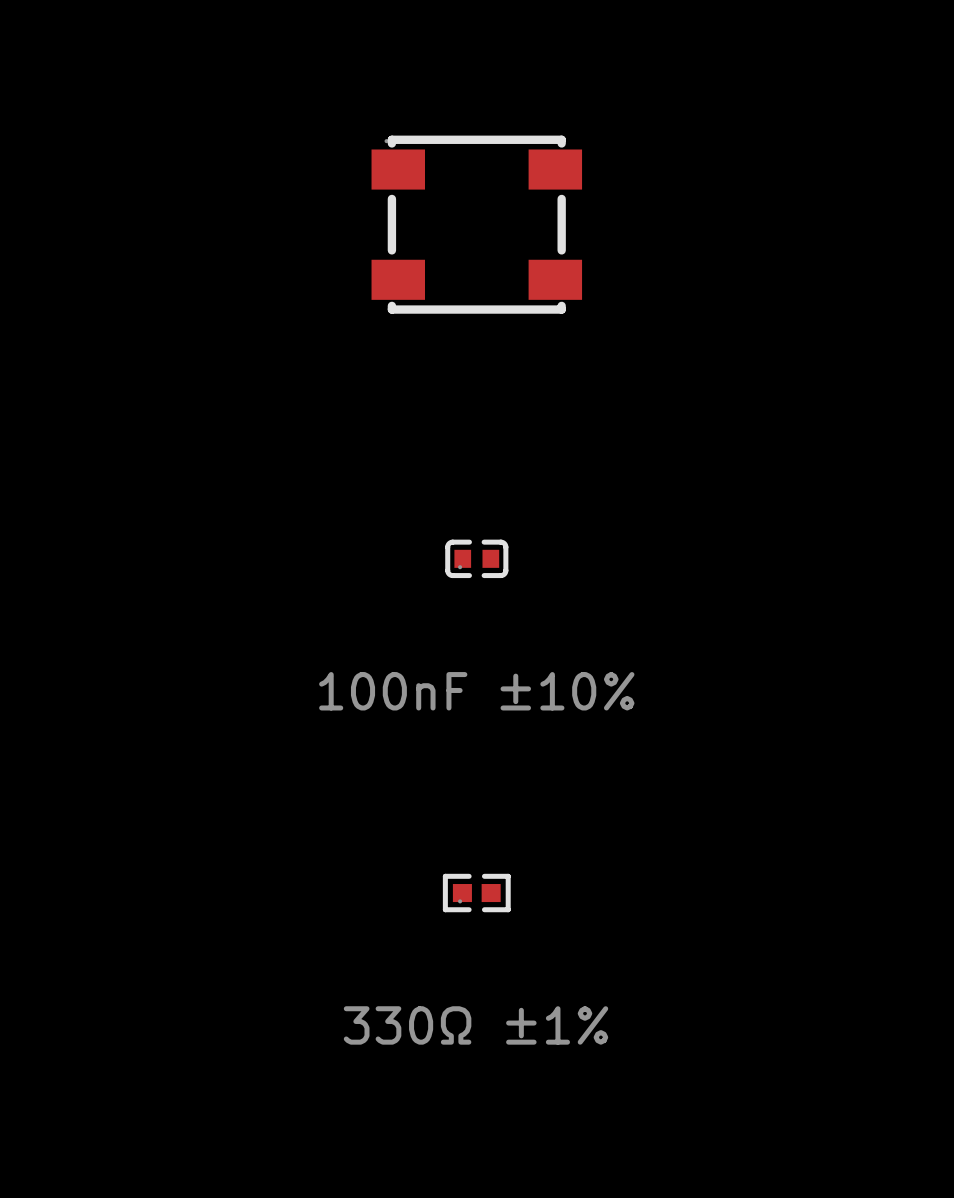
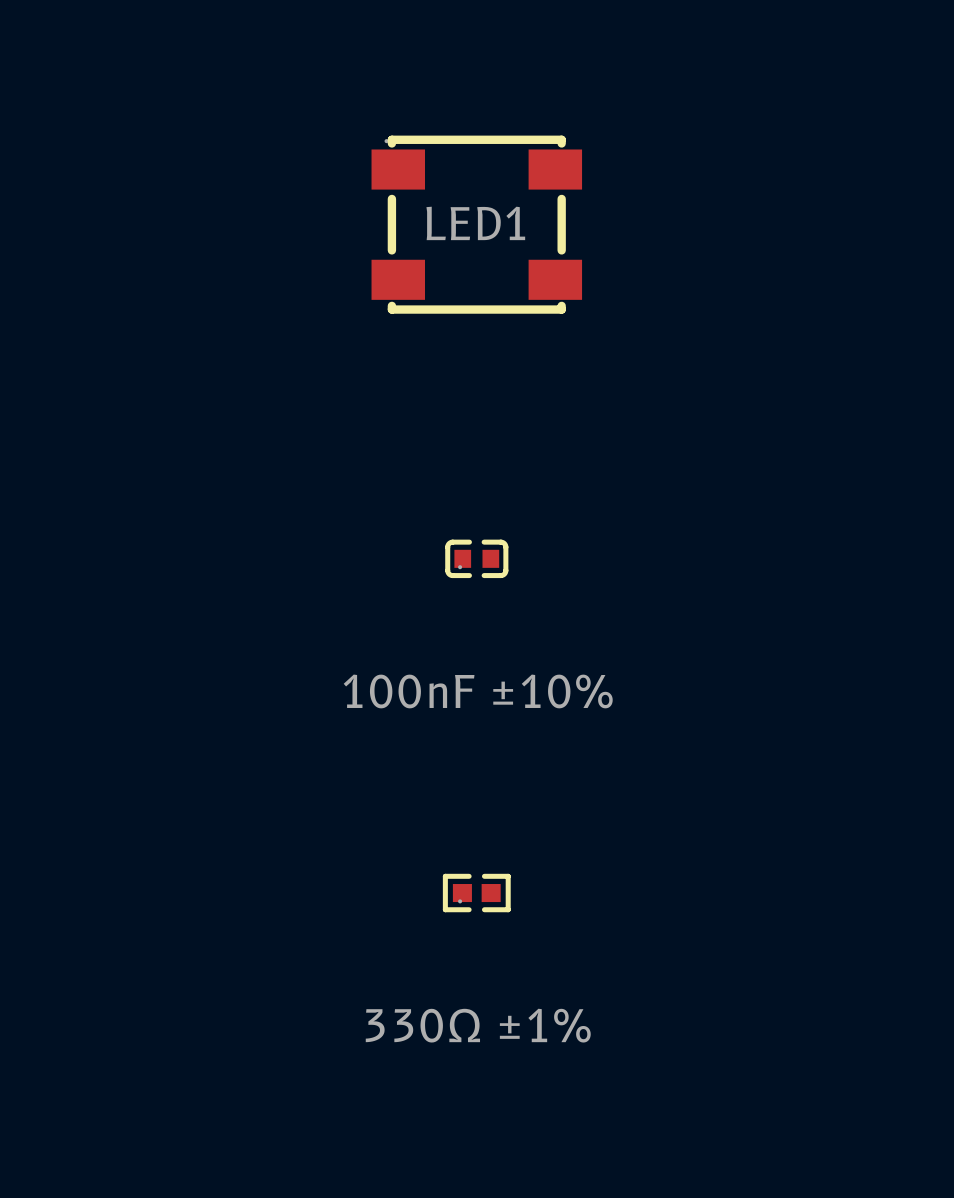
LED1 name: none -> LED1 (475, 223)

